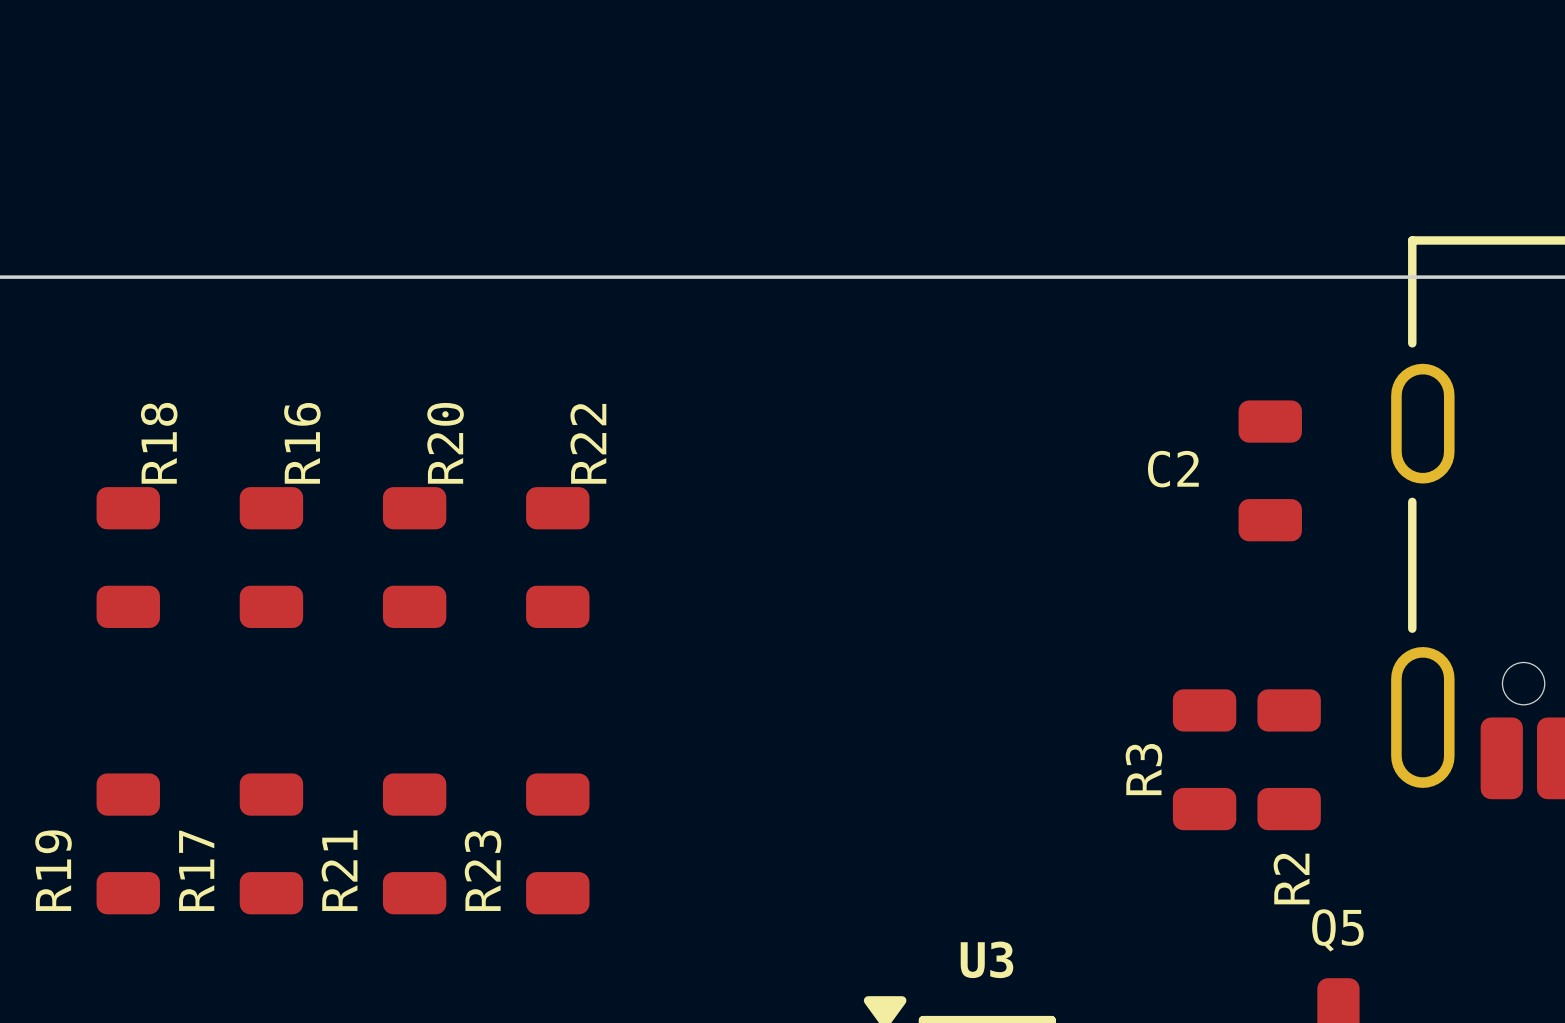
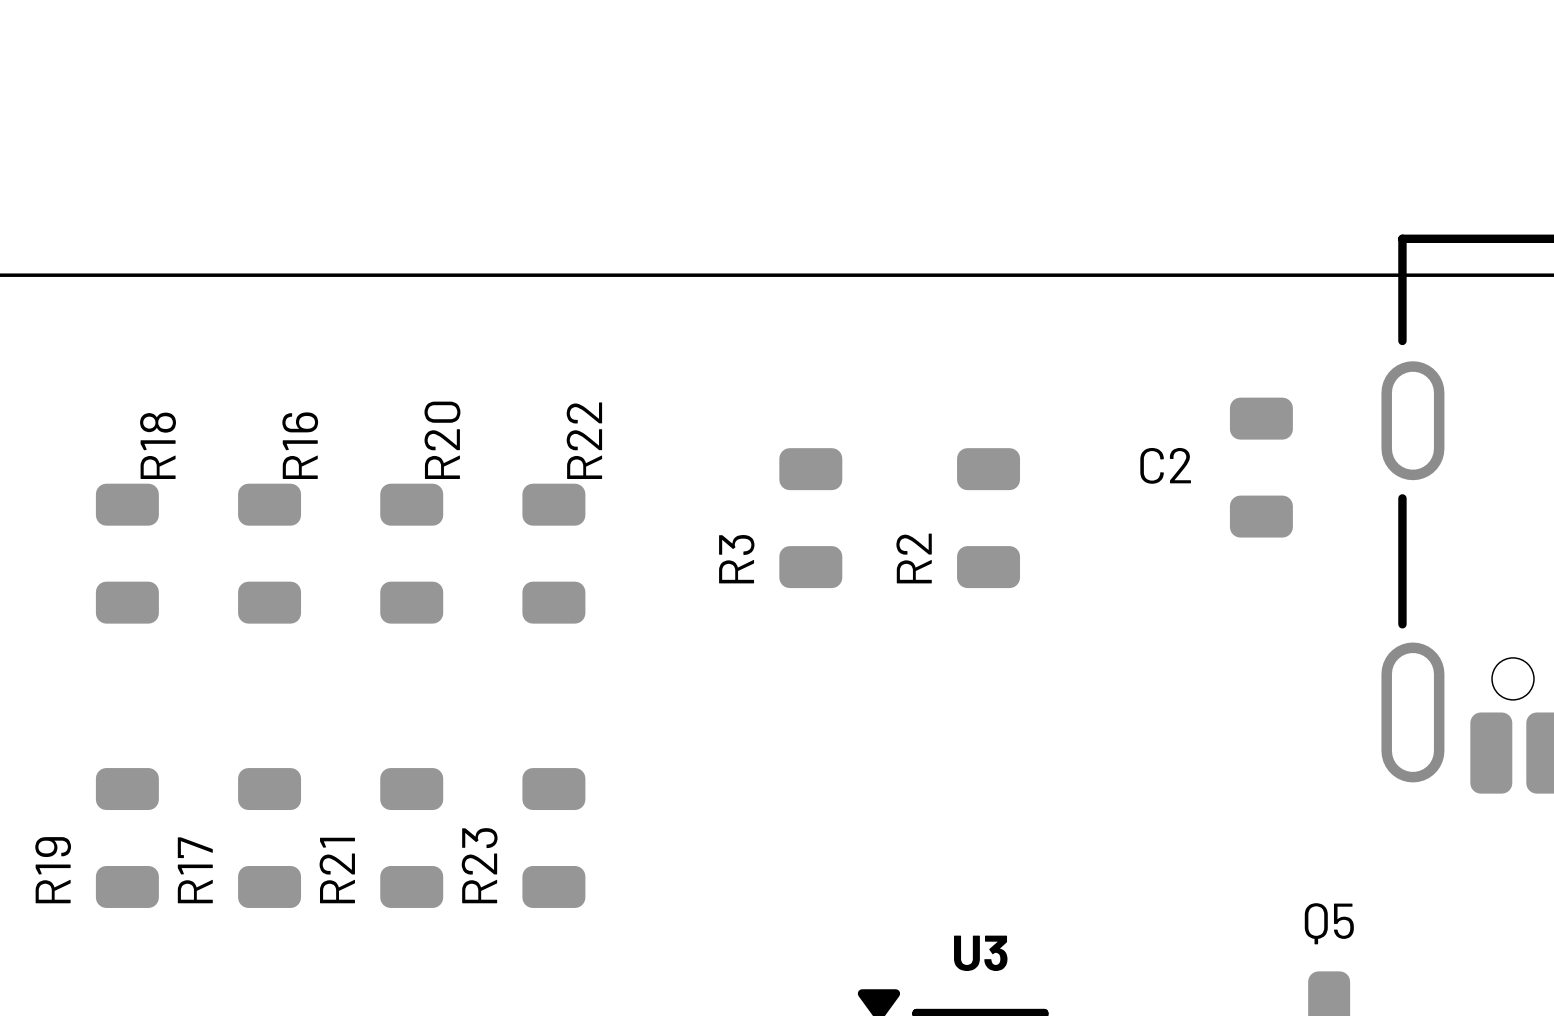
R3 position: (1204, 759) -> (810, 518)
R2 position: (1289, 759) -> (988, 518)
R3 name position: R3 (1143, 769) -> R3 (736, 559)
R2 name position: R2 (1291, 878) -> R2 (914, 558)

